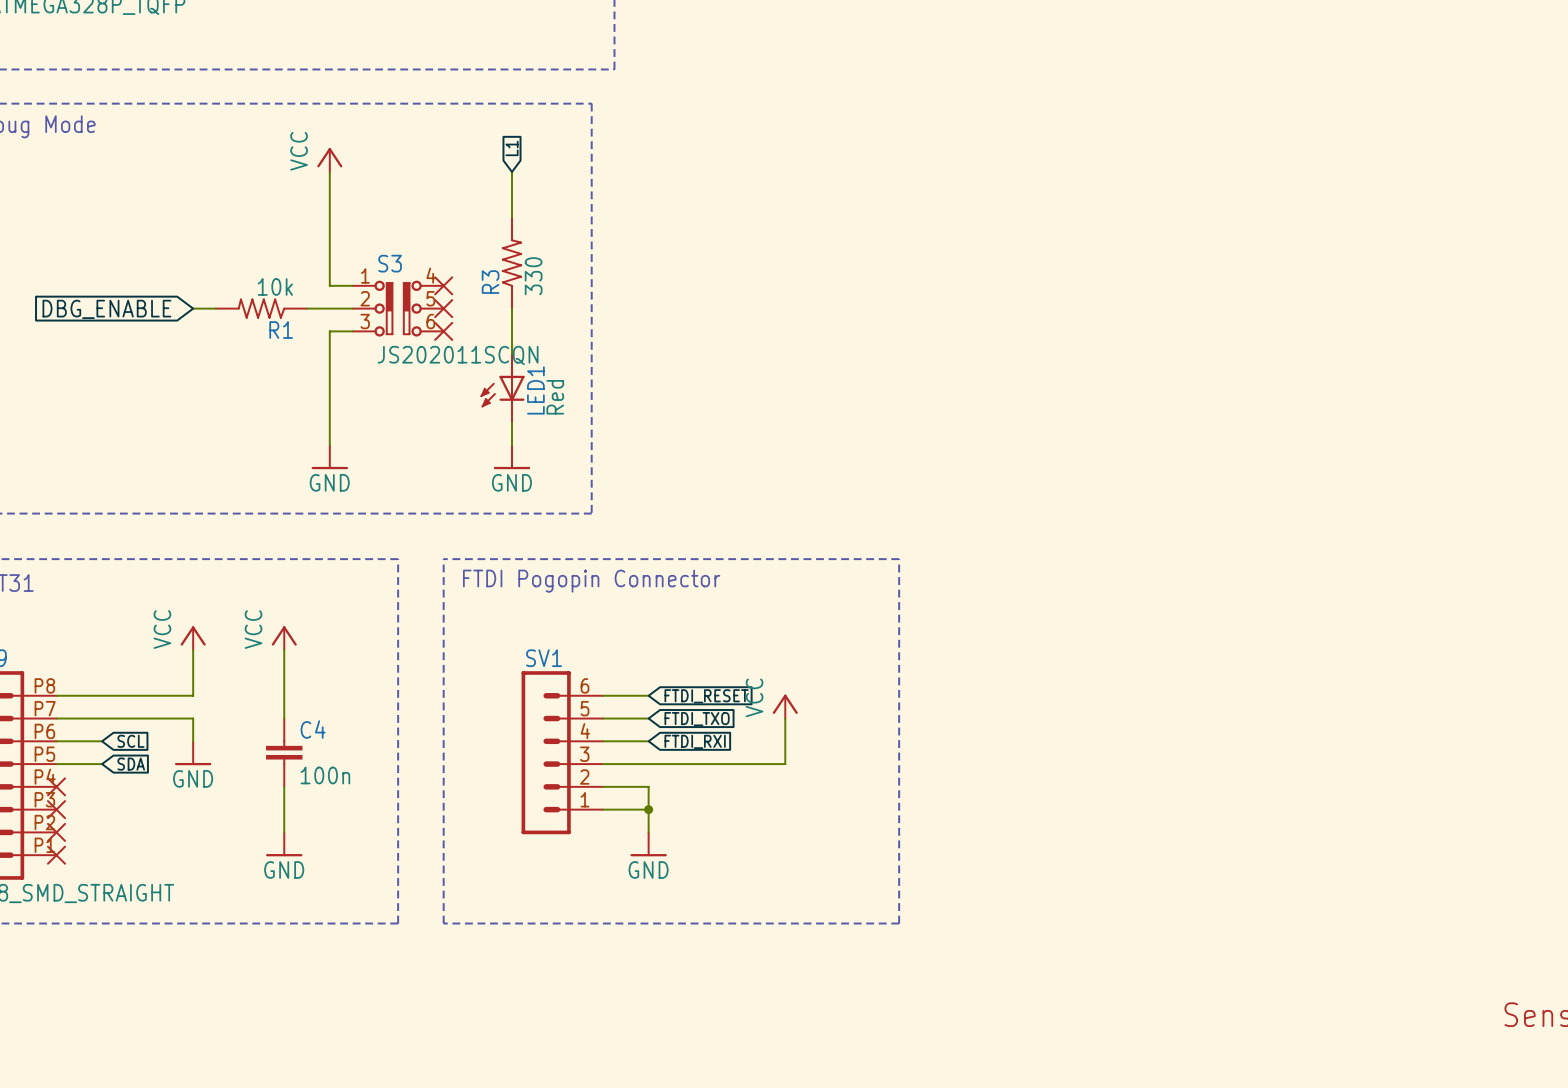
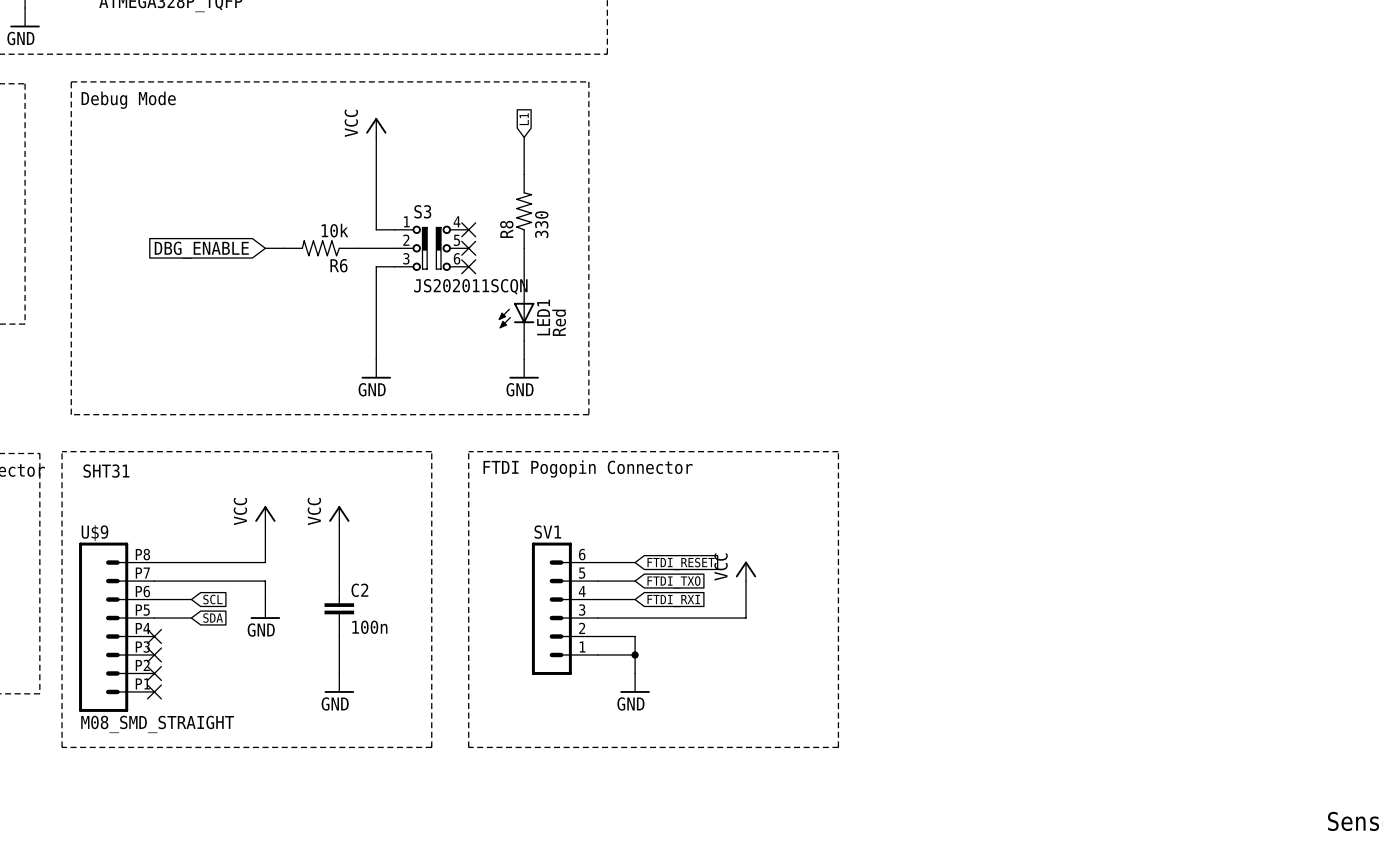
R3 name: R3 (490, 282) -> R8 (506, 229)
R1 name: R1 (281, 330) -> R6 (338, 265)
C4 name: C4 (313, 729) -> C2 (359, 590)

